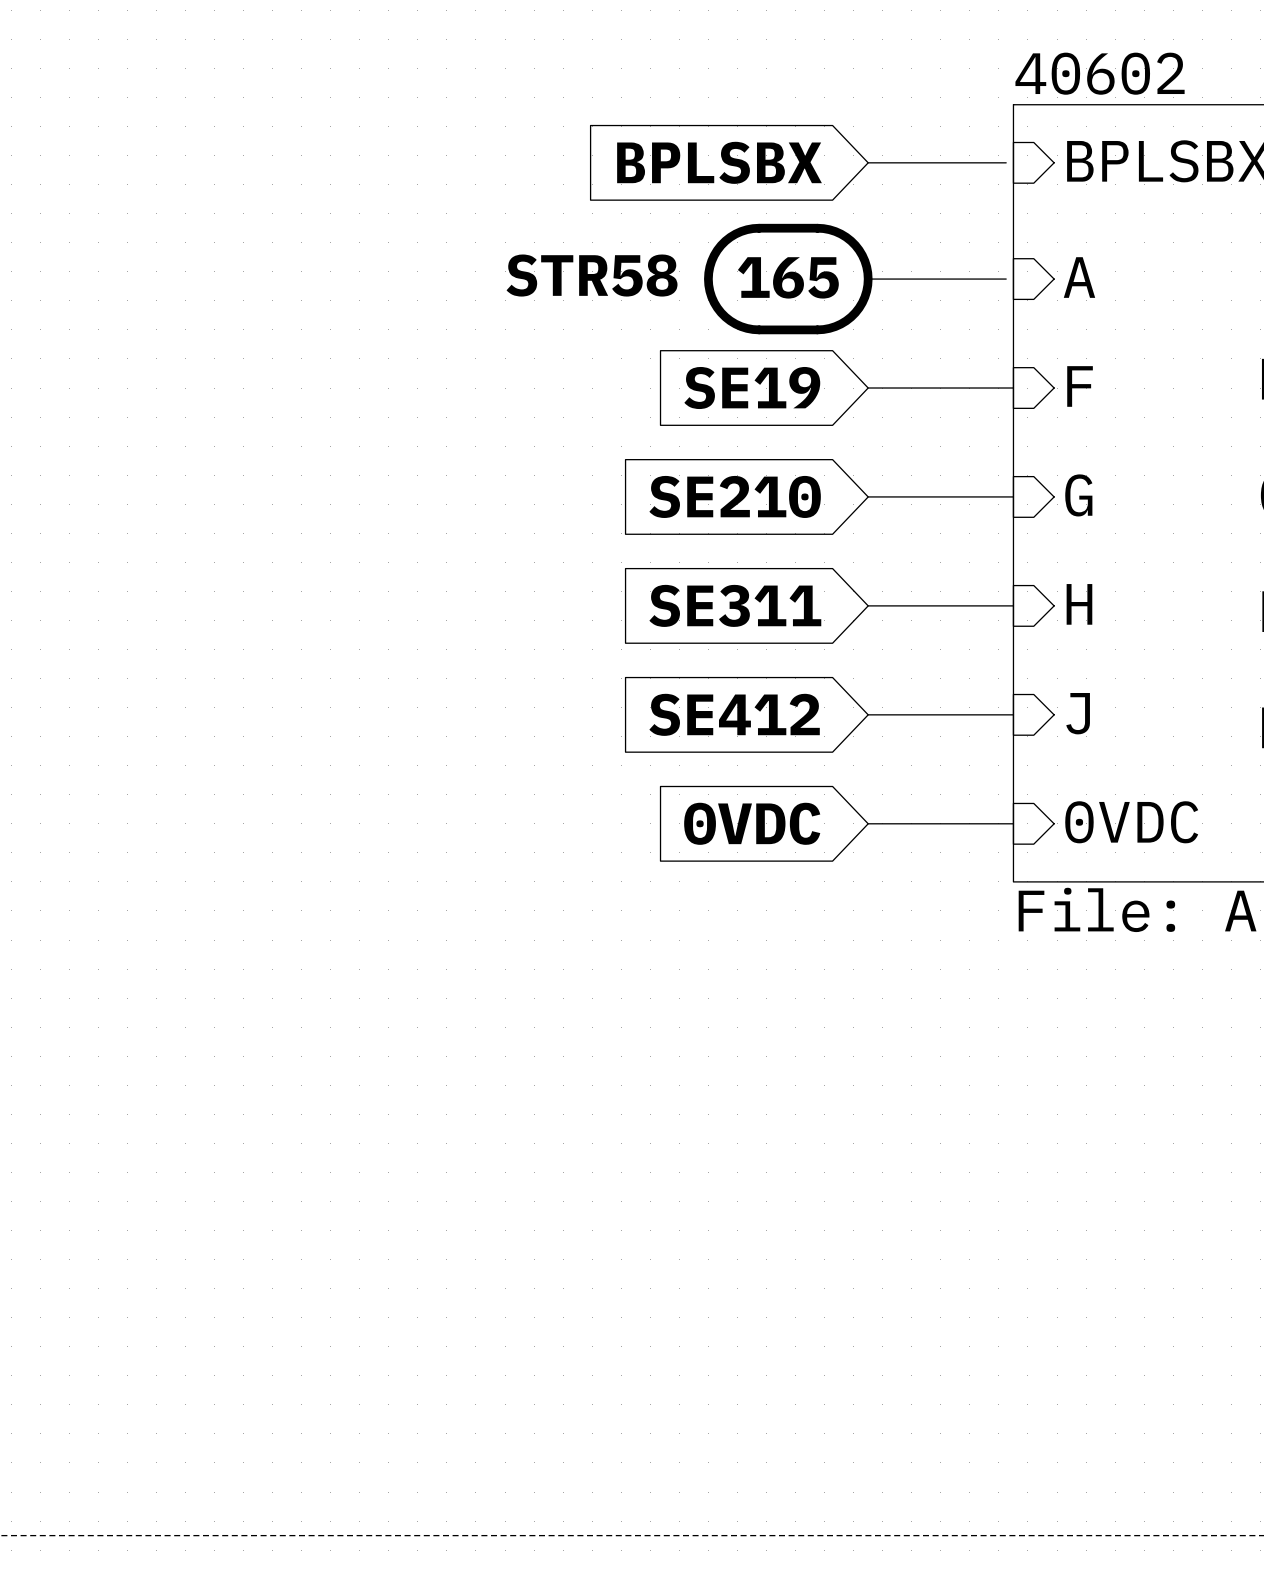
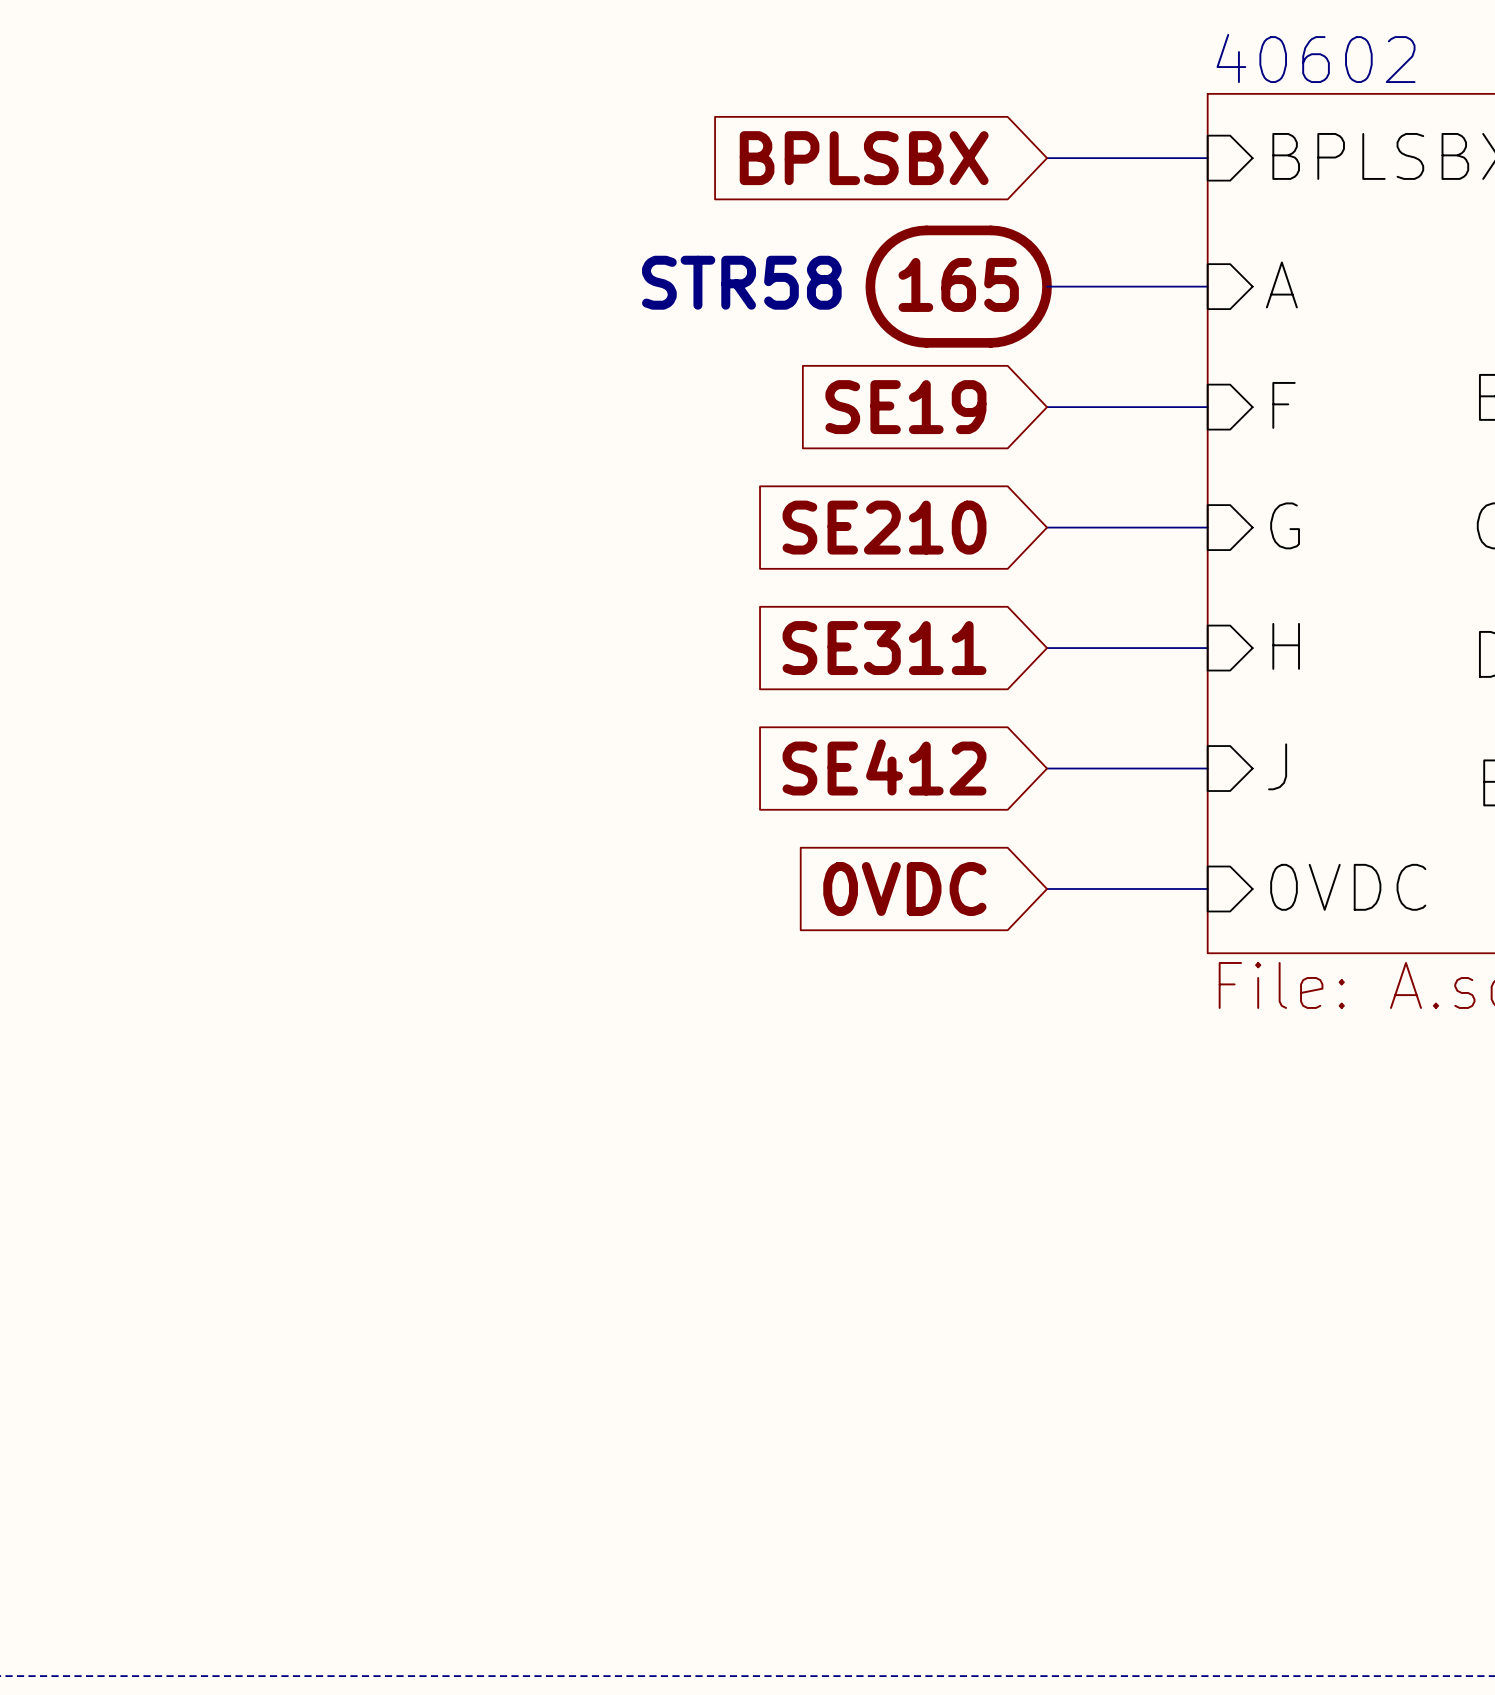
wire: none -> (1199, 158) (1207, 158)
wire: none -> (1199, 286) (1207, 286)

